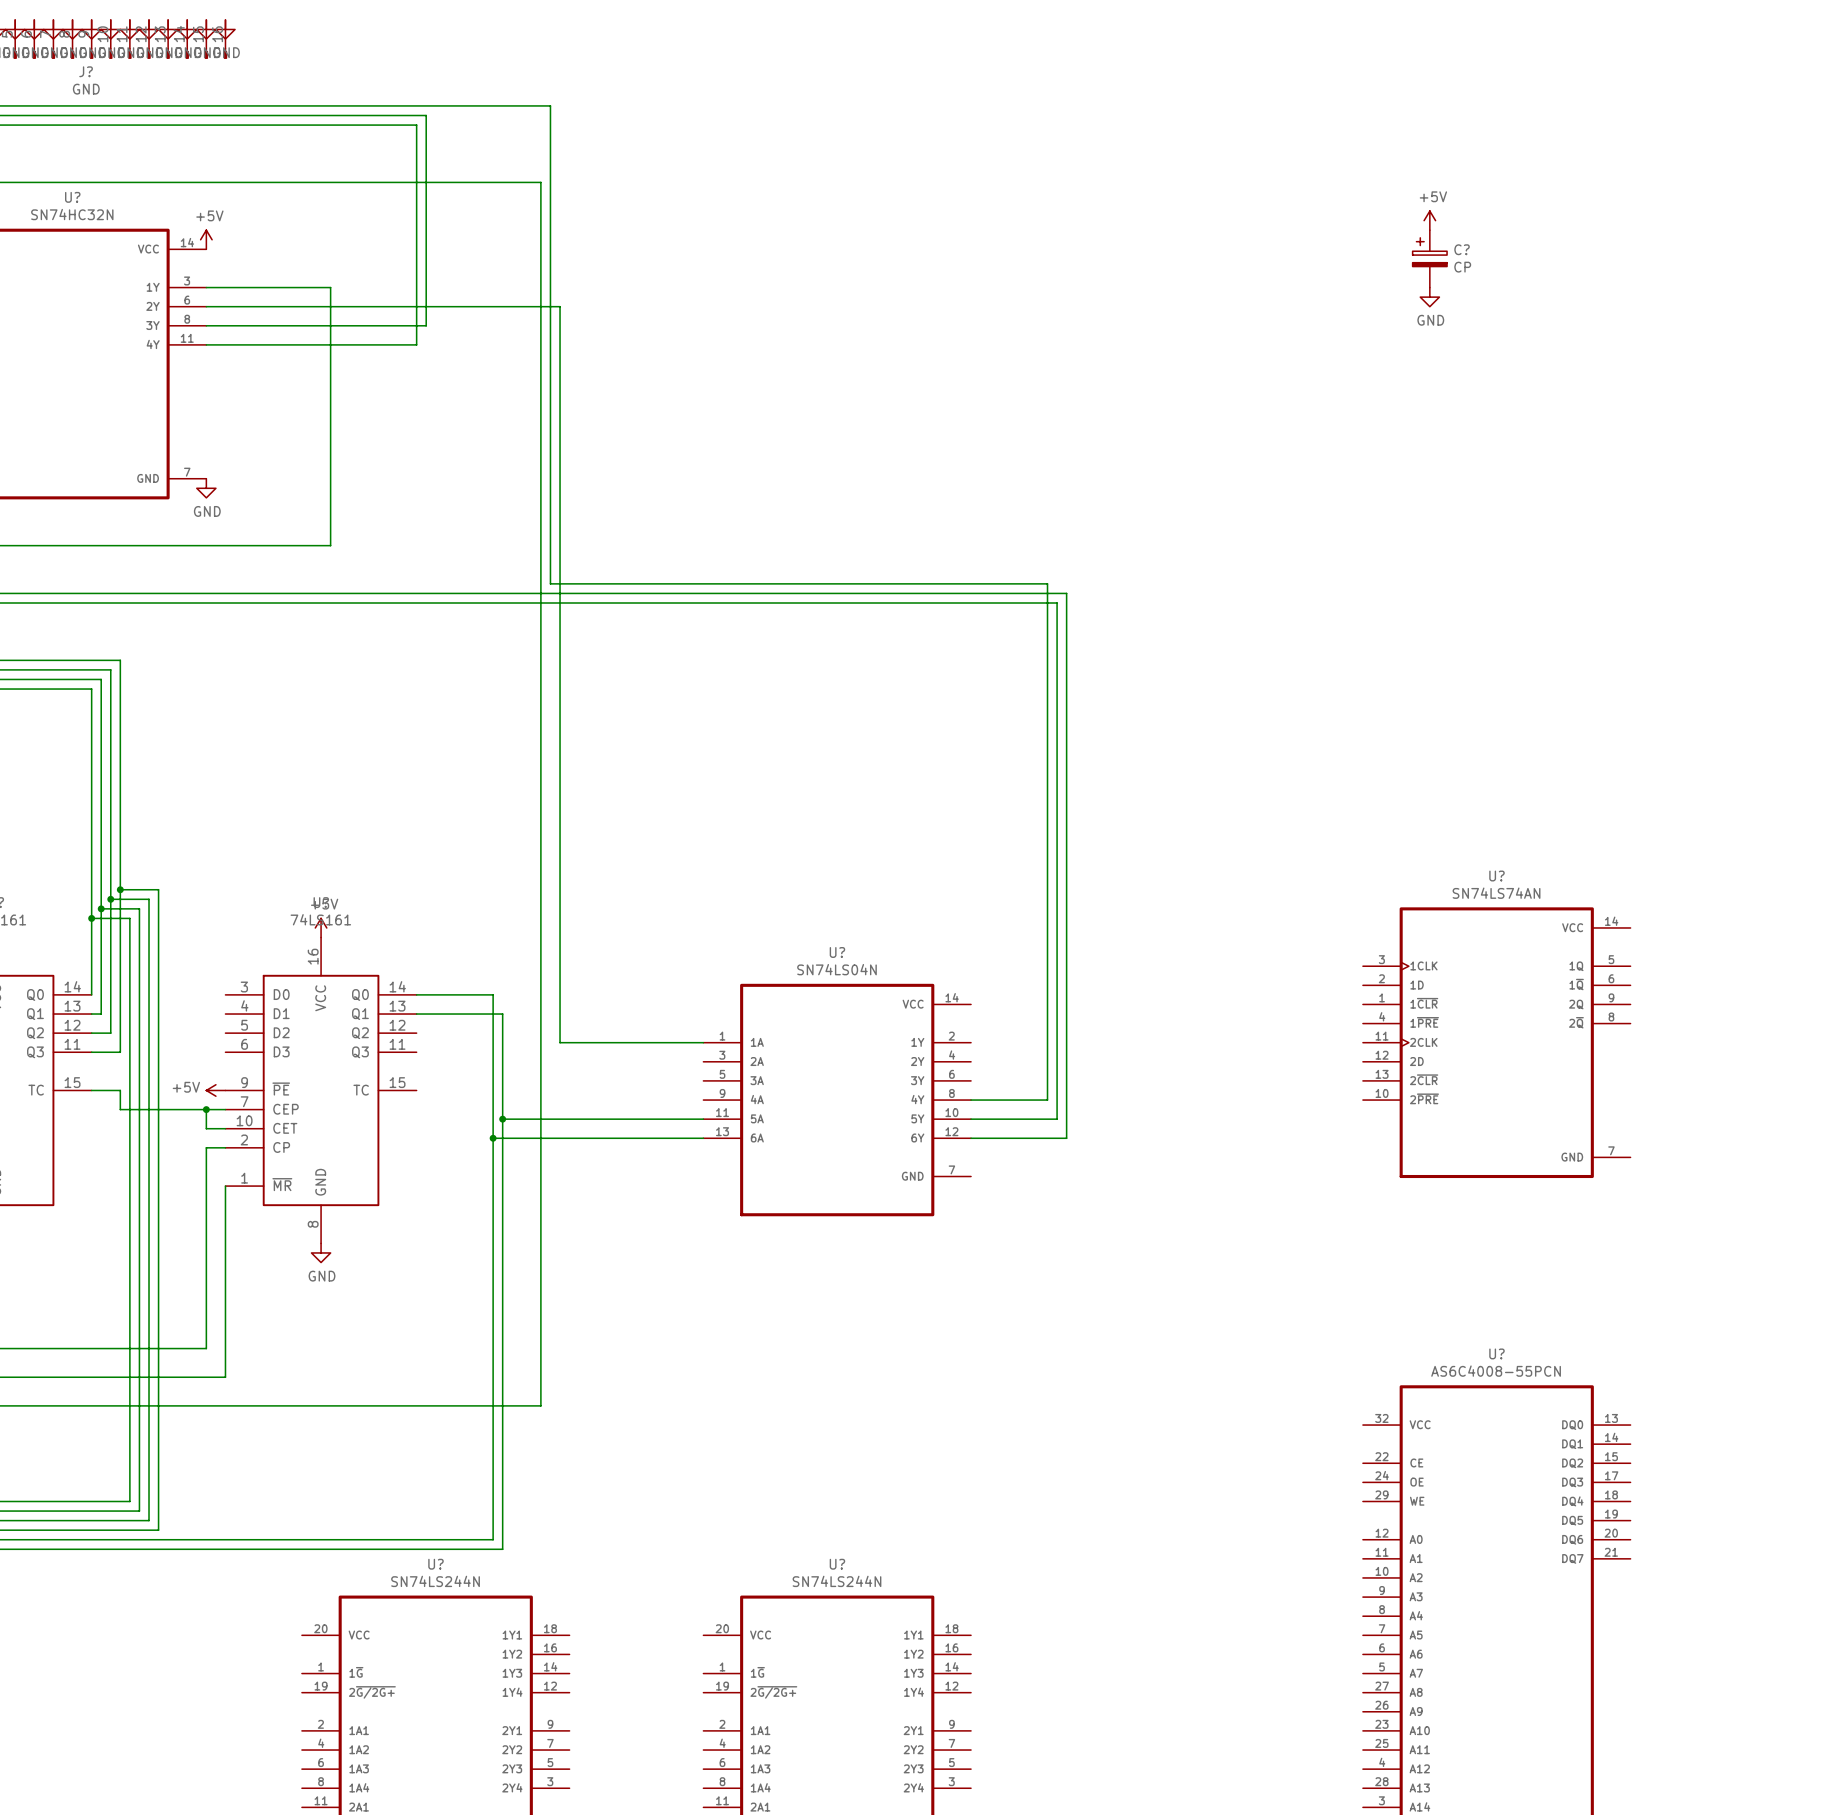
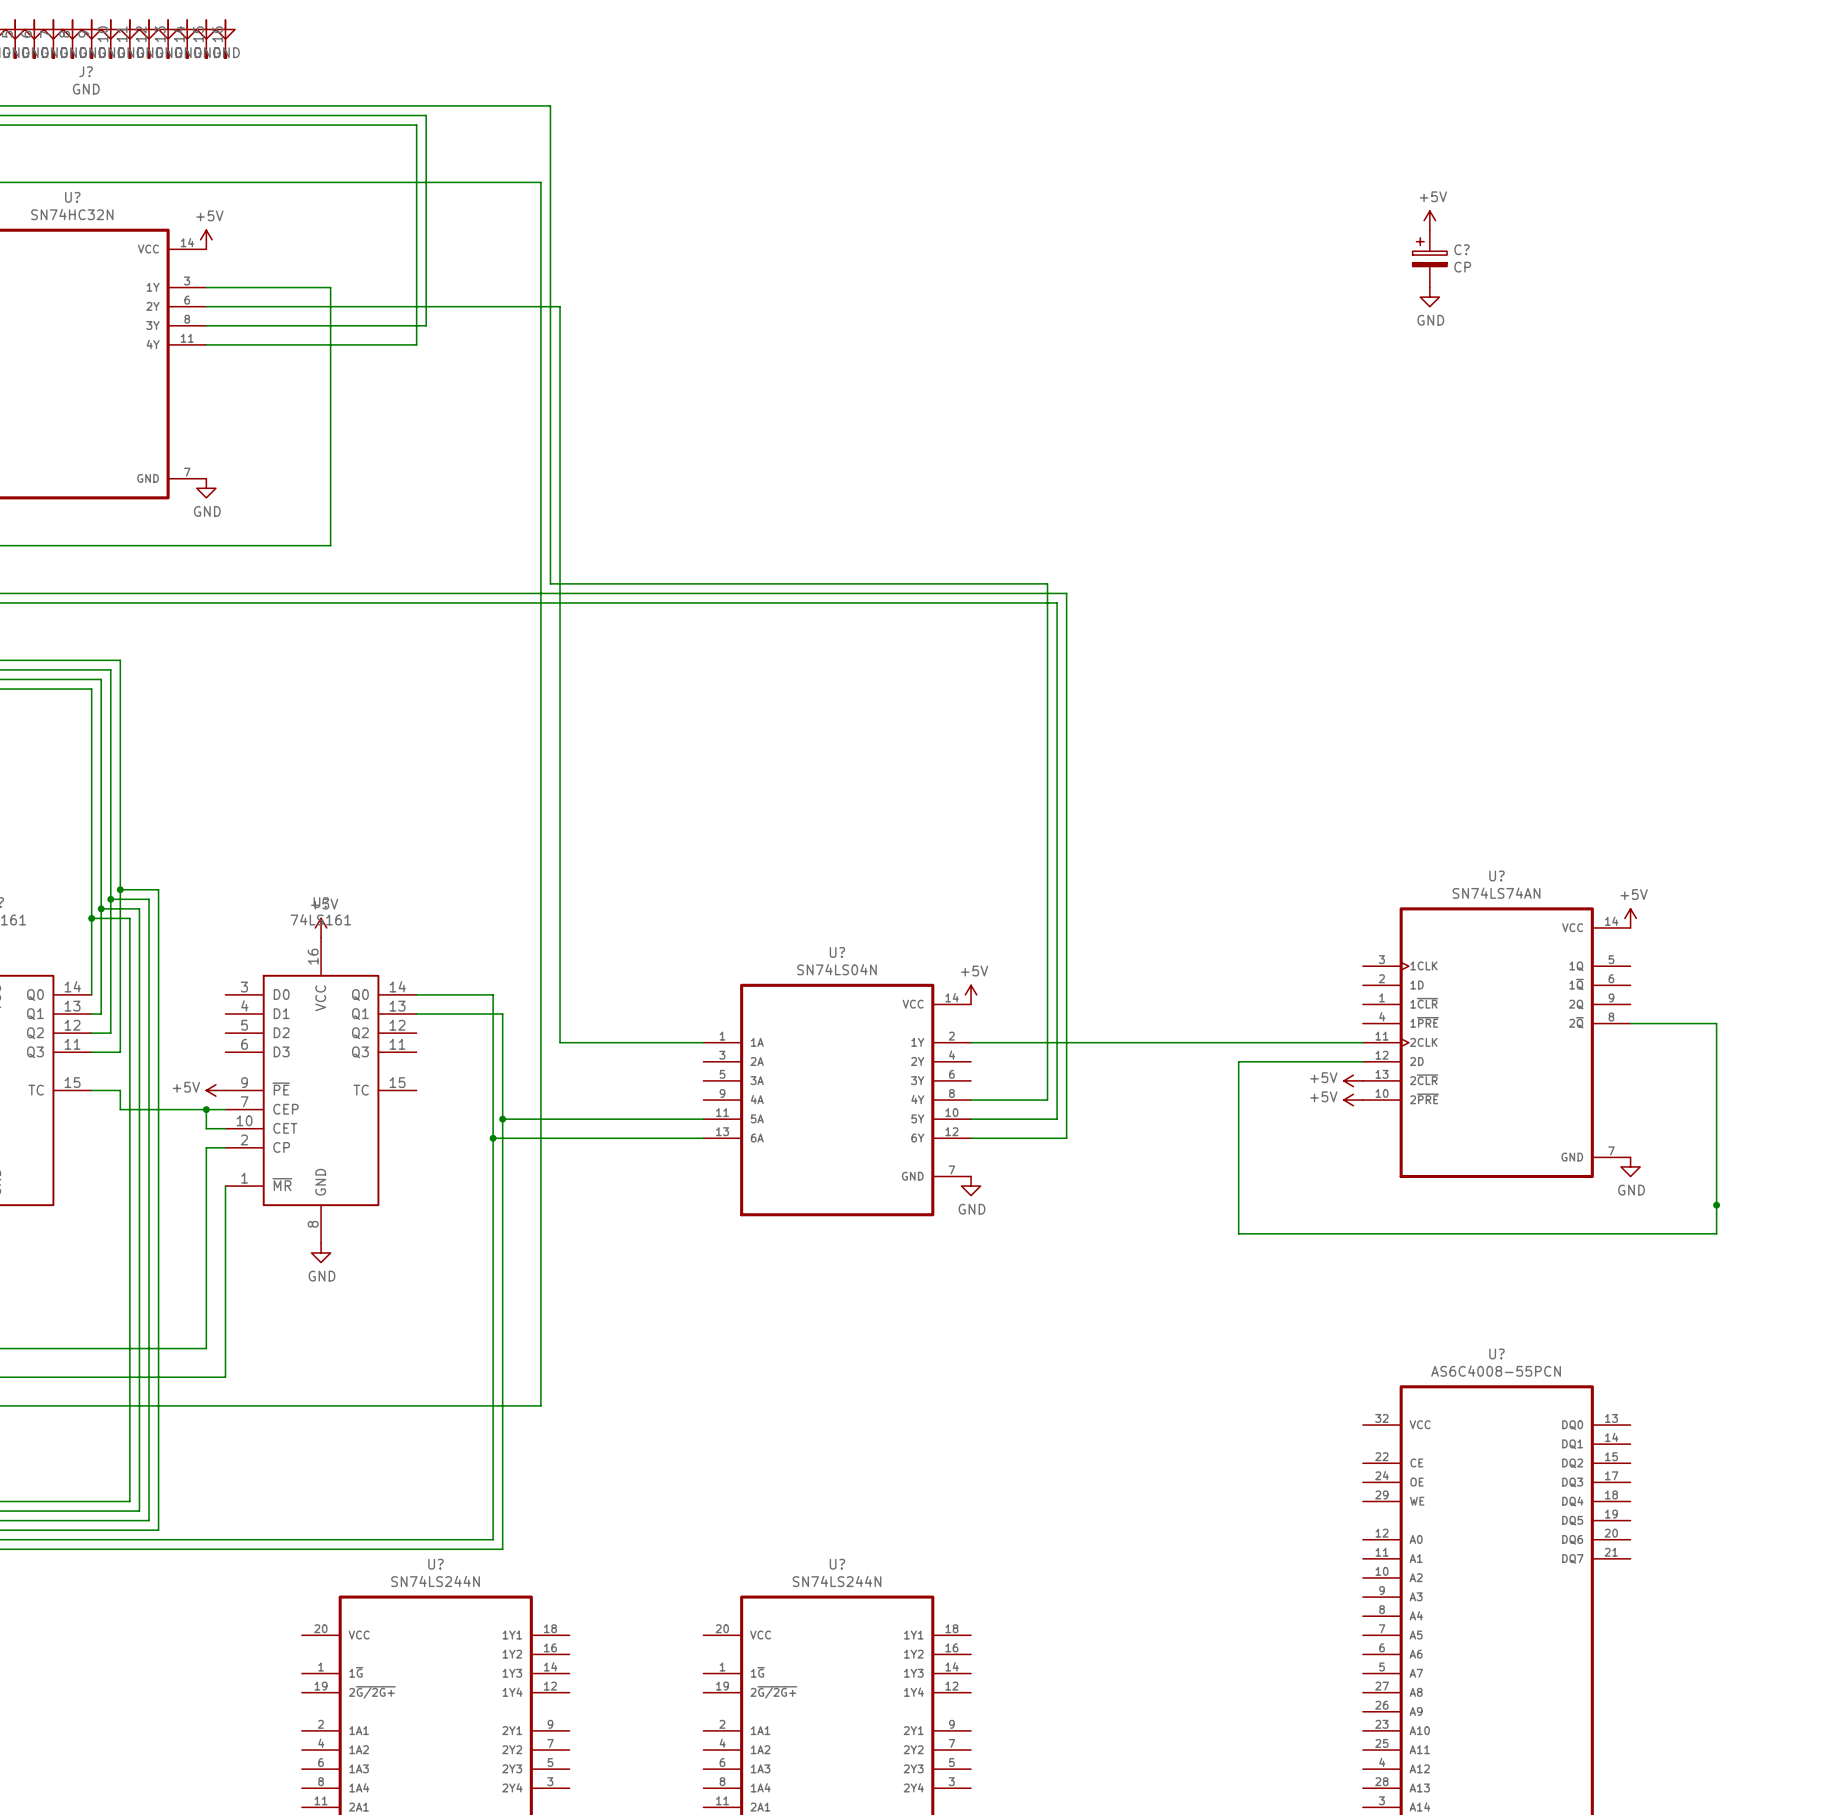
power symbol: none -> +5V (1630, 918)
power symbol: none -> +5V (971, 994)
wire: none -> (1630, 1023) (1716, 1023) (1716, 1233) (1238, 1233) (1238, 1061) (1362, 1061)
wire: none -> (971, 1042) (1362, 1042)
power symbol: none -> +5V (1353, 1080)
power symbol: none -> +5V (1353, 1100)
power symbol: none -> GND (1630, 1166)
power symbol: none -> GND (971, 1186)
junction: none -> (1716, 1205)

